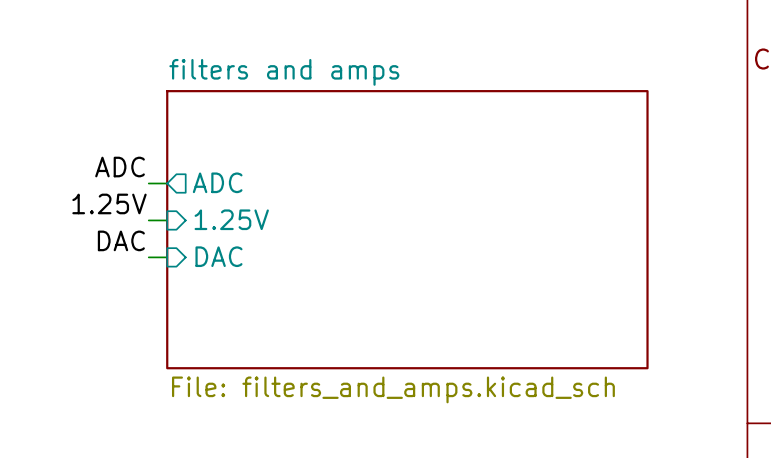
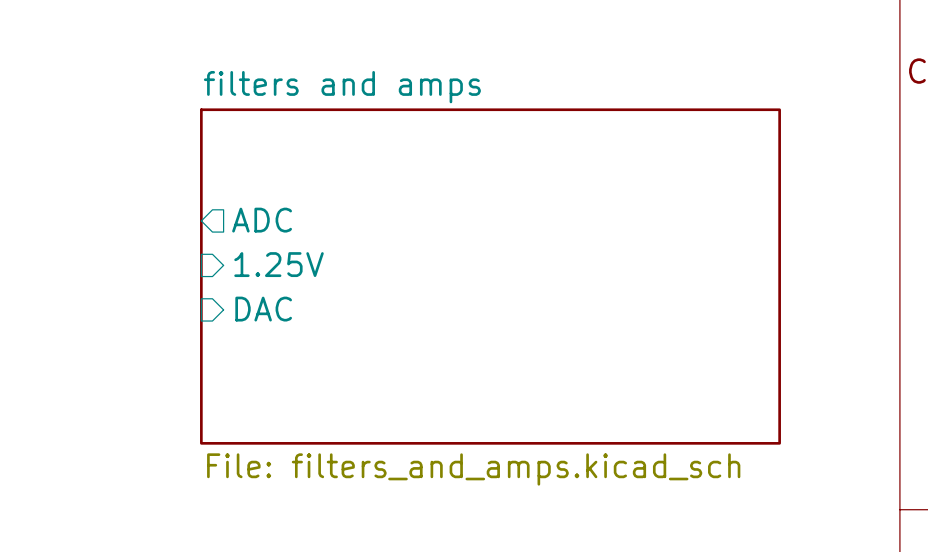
label: ADC (120, 167) -> none
wire: (148, 183) (167, 183) -> none
label: 1.25V (109, 203) -> none
wire: (148, 220) (167, 220) -> none
label: DAC (121, 240) -> none
wire: (148, 257) (167, 257) -> none

